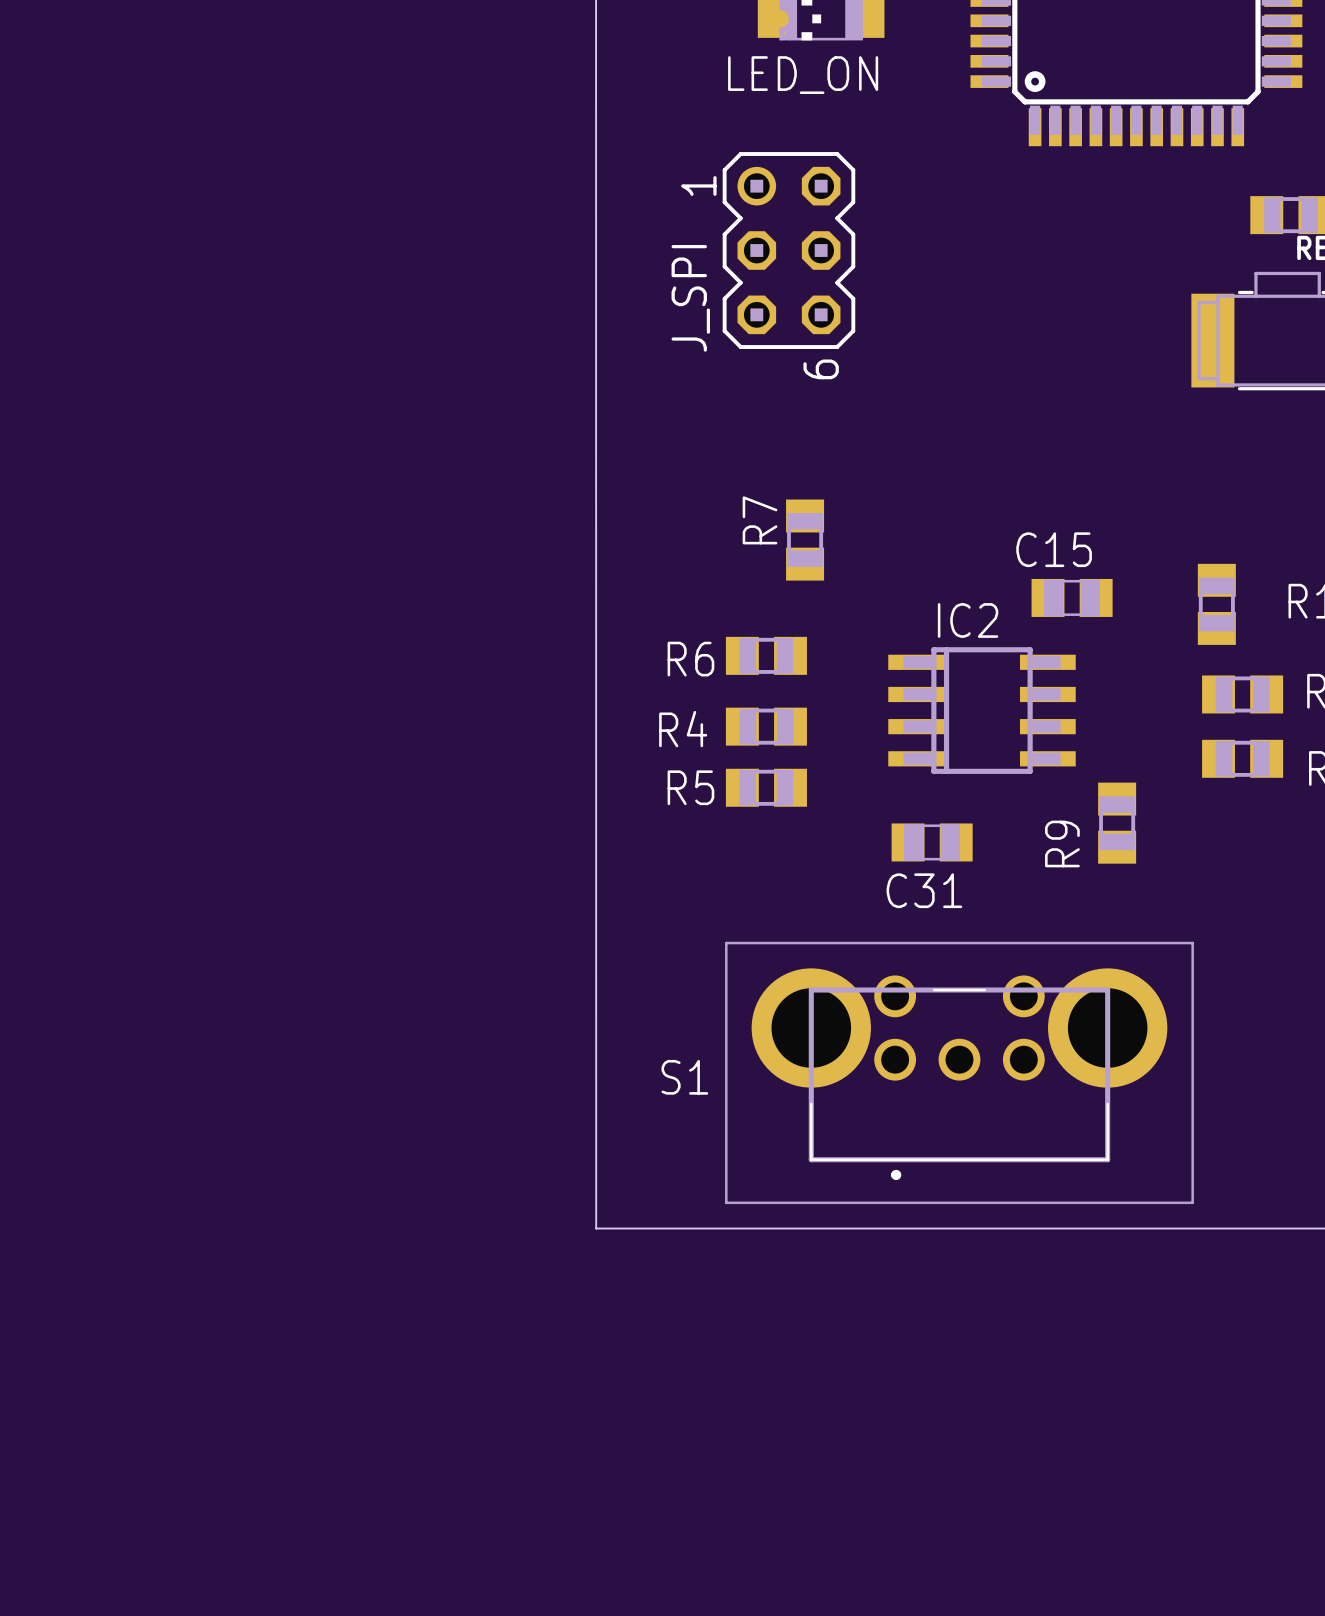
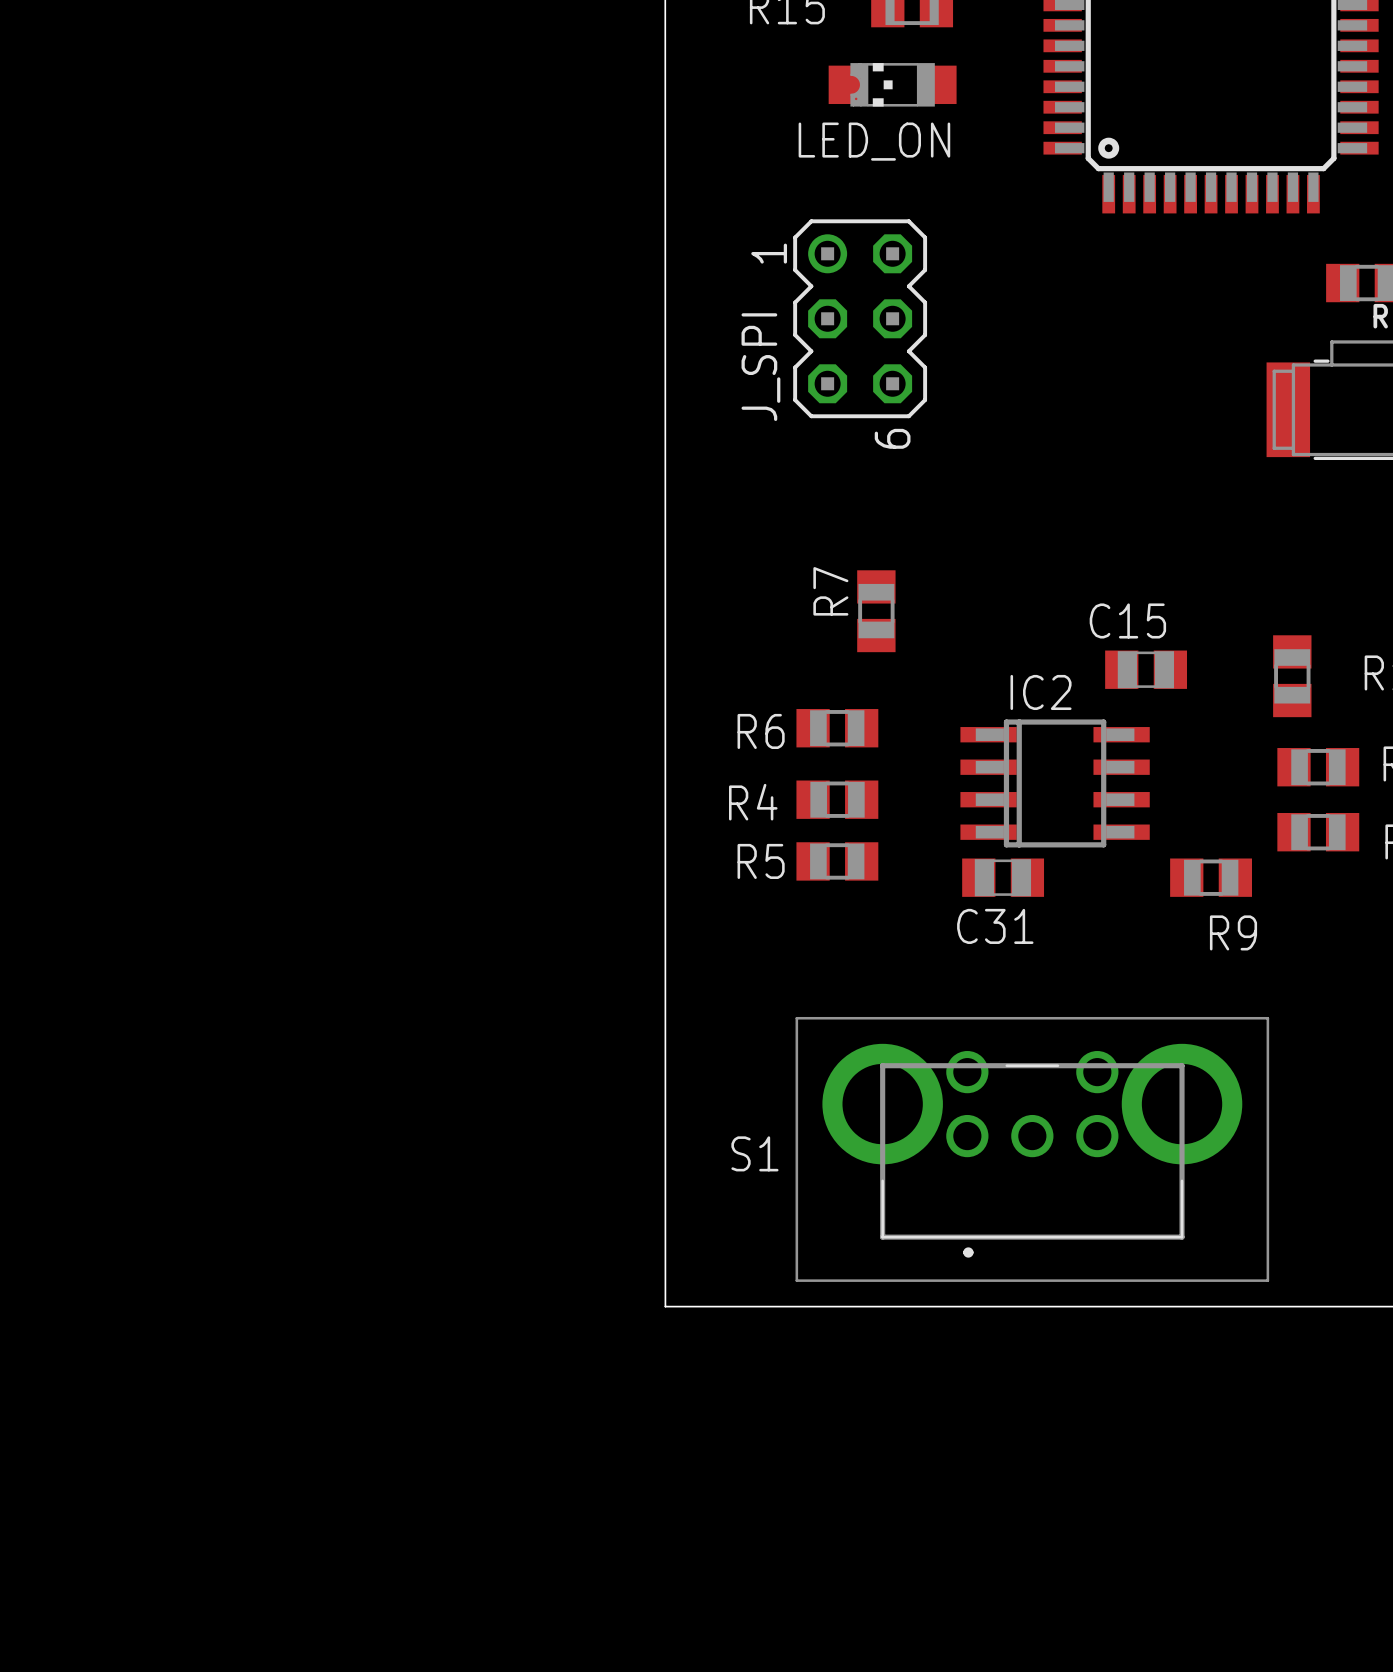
R9 rotation: 0° (1117, 823) -> 90° clockwise (1211, 877)
C31 position: (932, 842) -> (1003, 877)
R9 name position: R9 (1062, 843) -> R9 (1233, 932)

